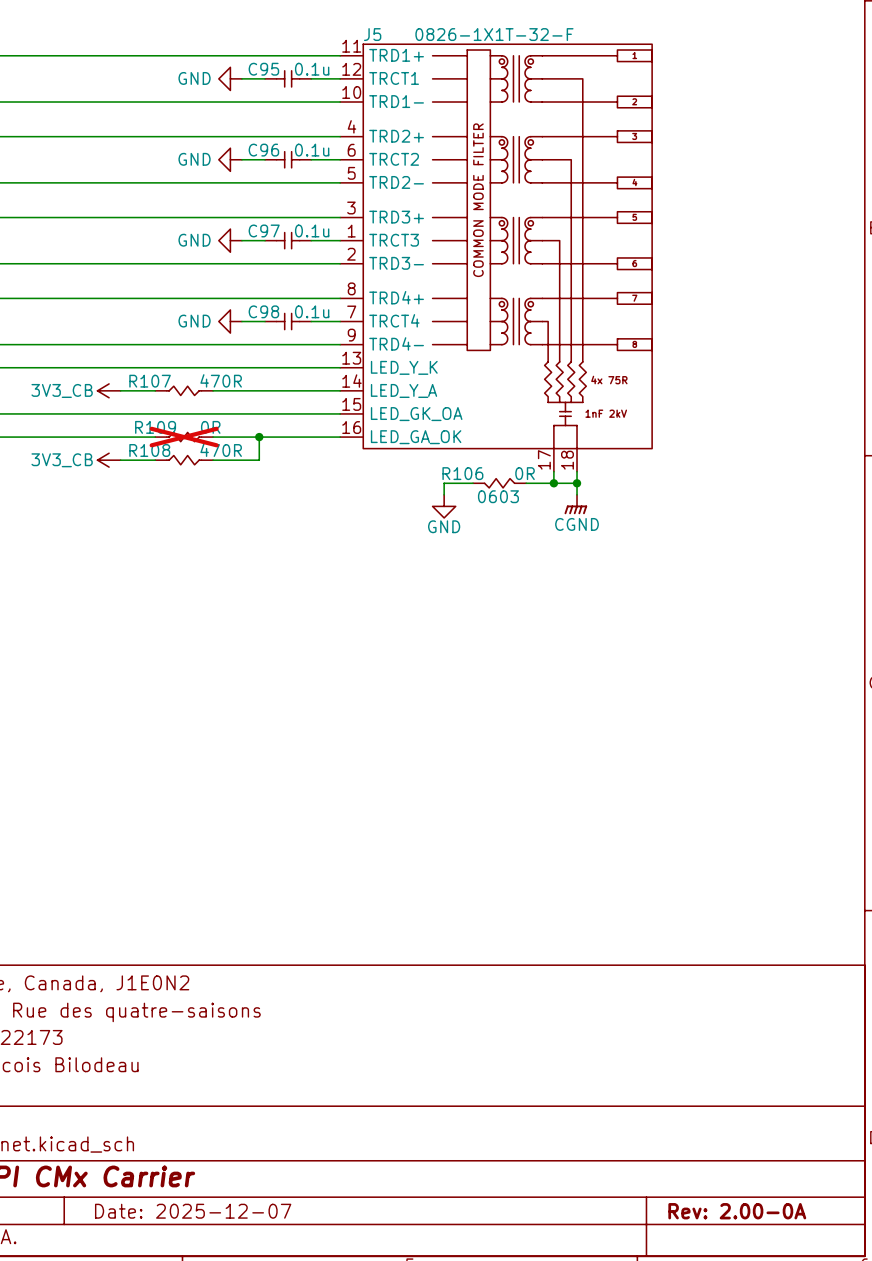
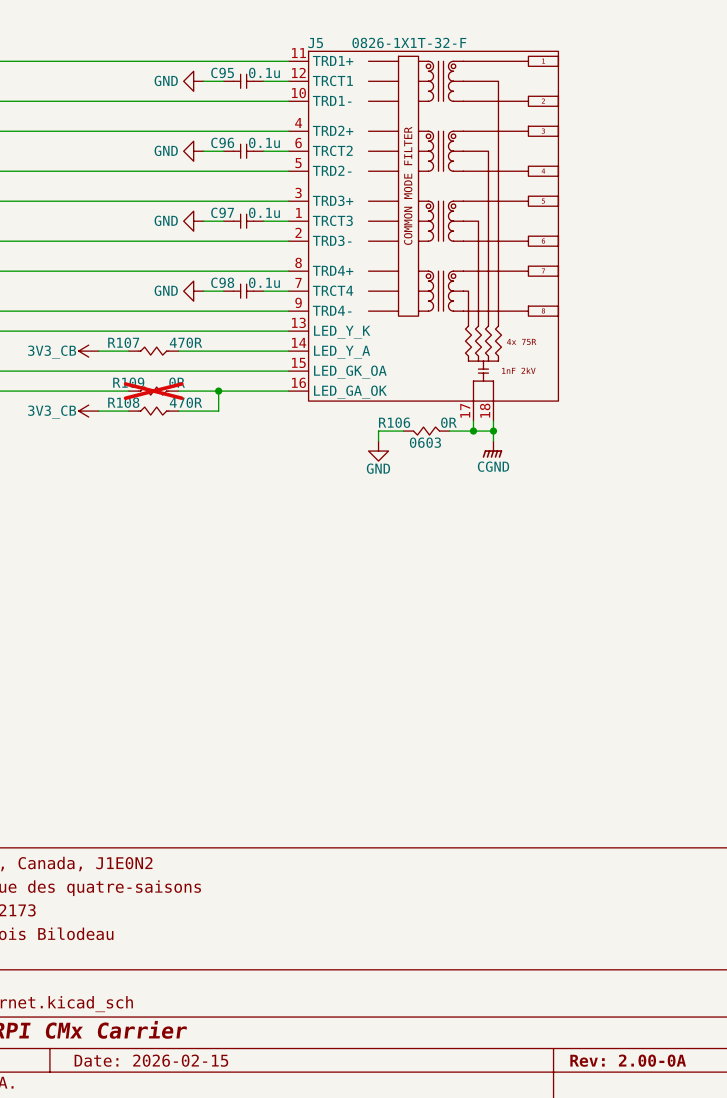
title block: Date: 2025-12-07 (193, 1211) -> Date: 2026-02-15 (151, 1060)

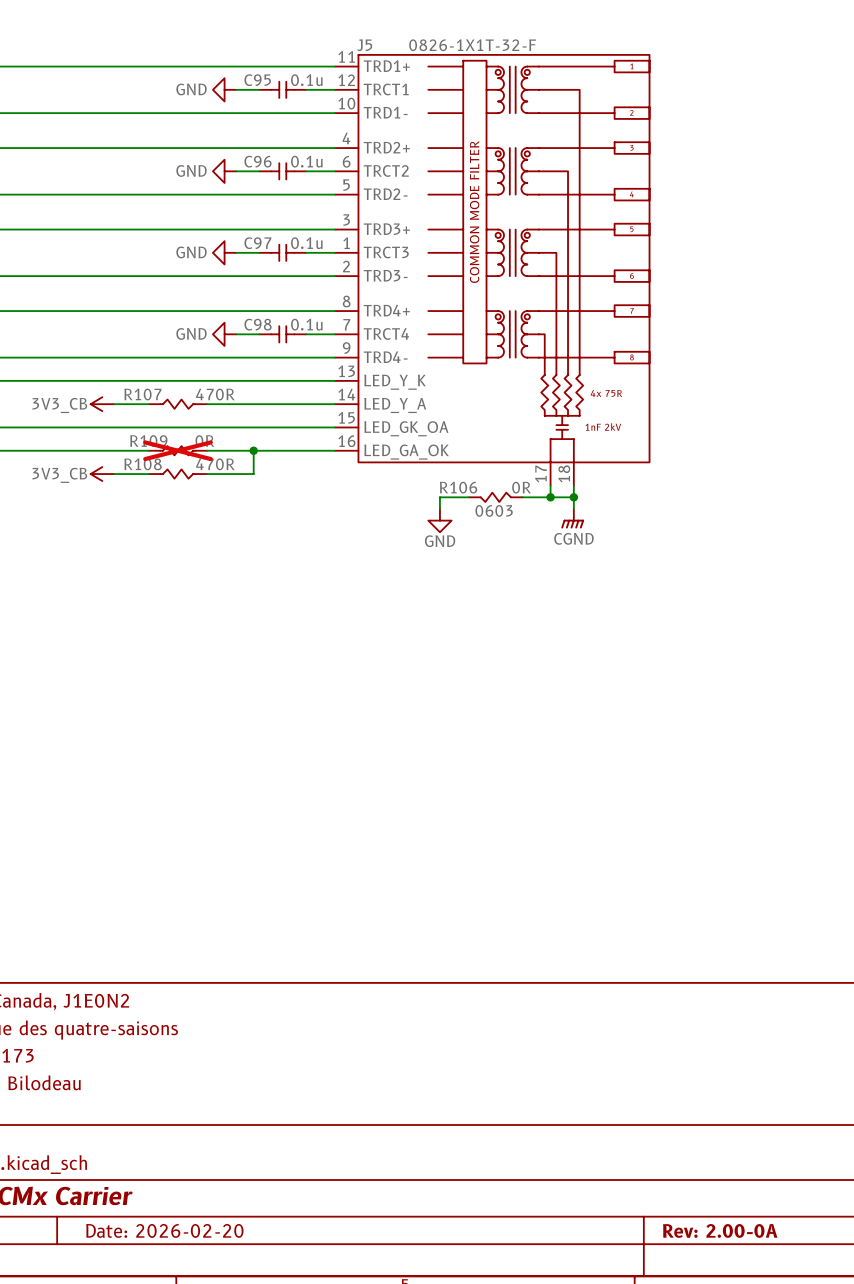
title block: Date: 2026-02-15 (151, 1060) -> Date: 2026-02-20 (164, 1230)

